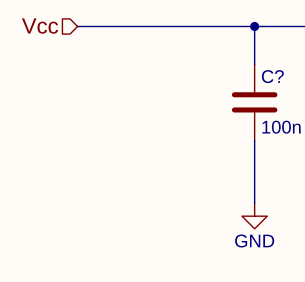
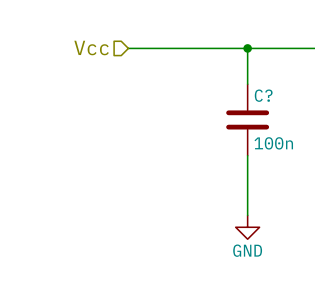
hierarchical label position: Vcc (40, 26) -> Vcc (91, 48)
wire: (77, 26) (128, 26) -> none

